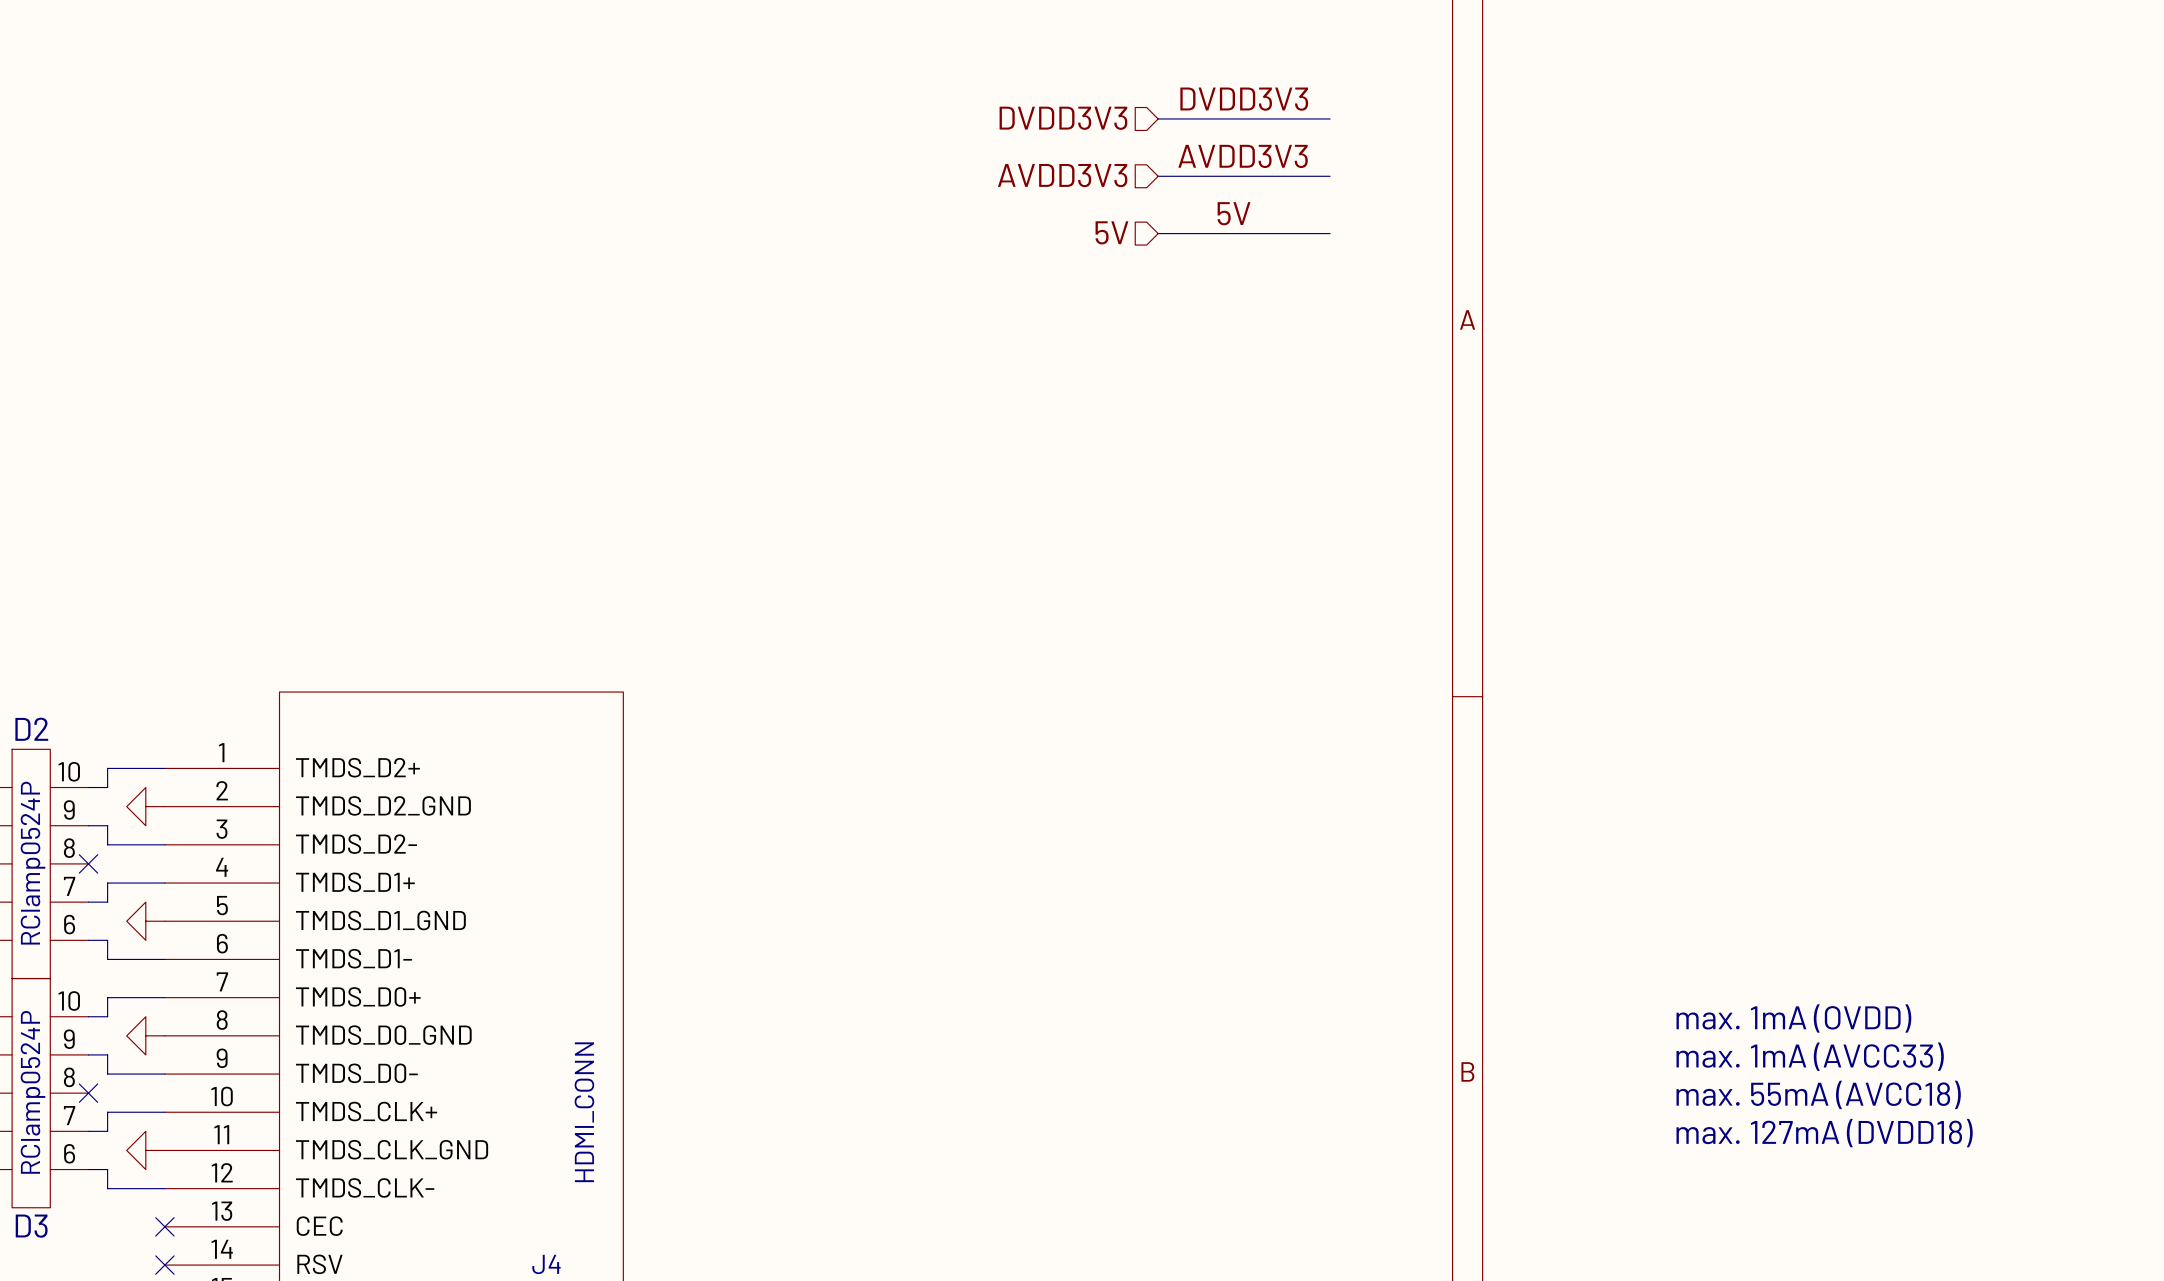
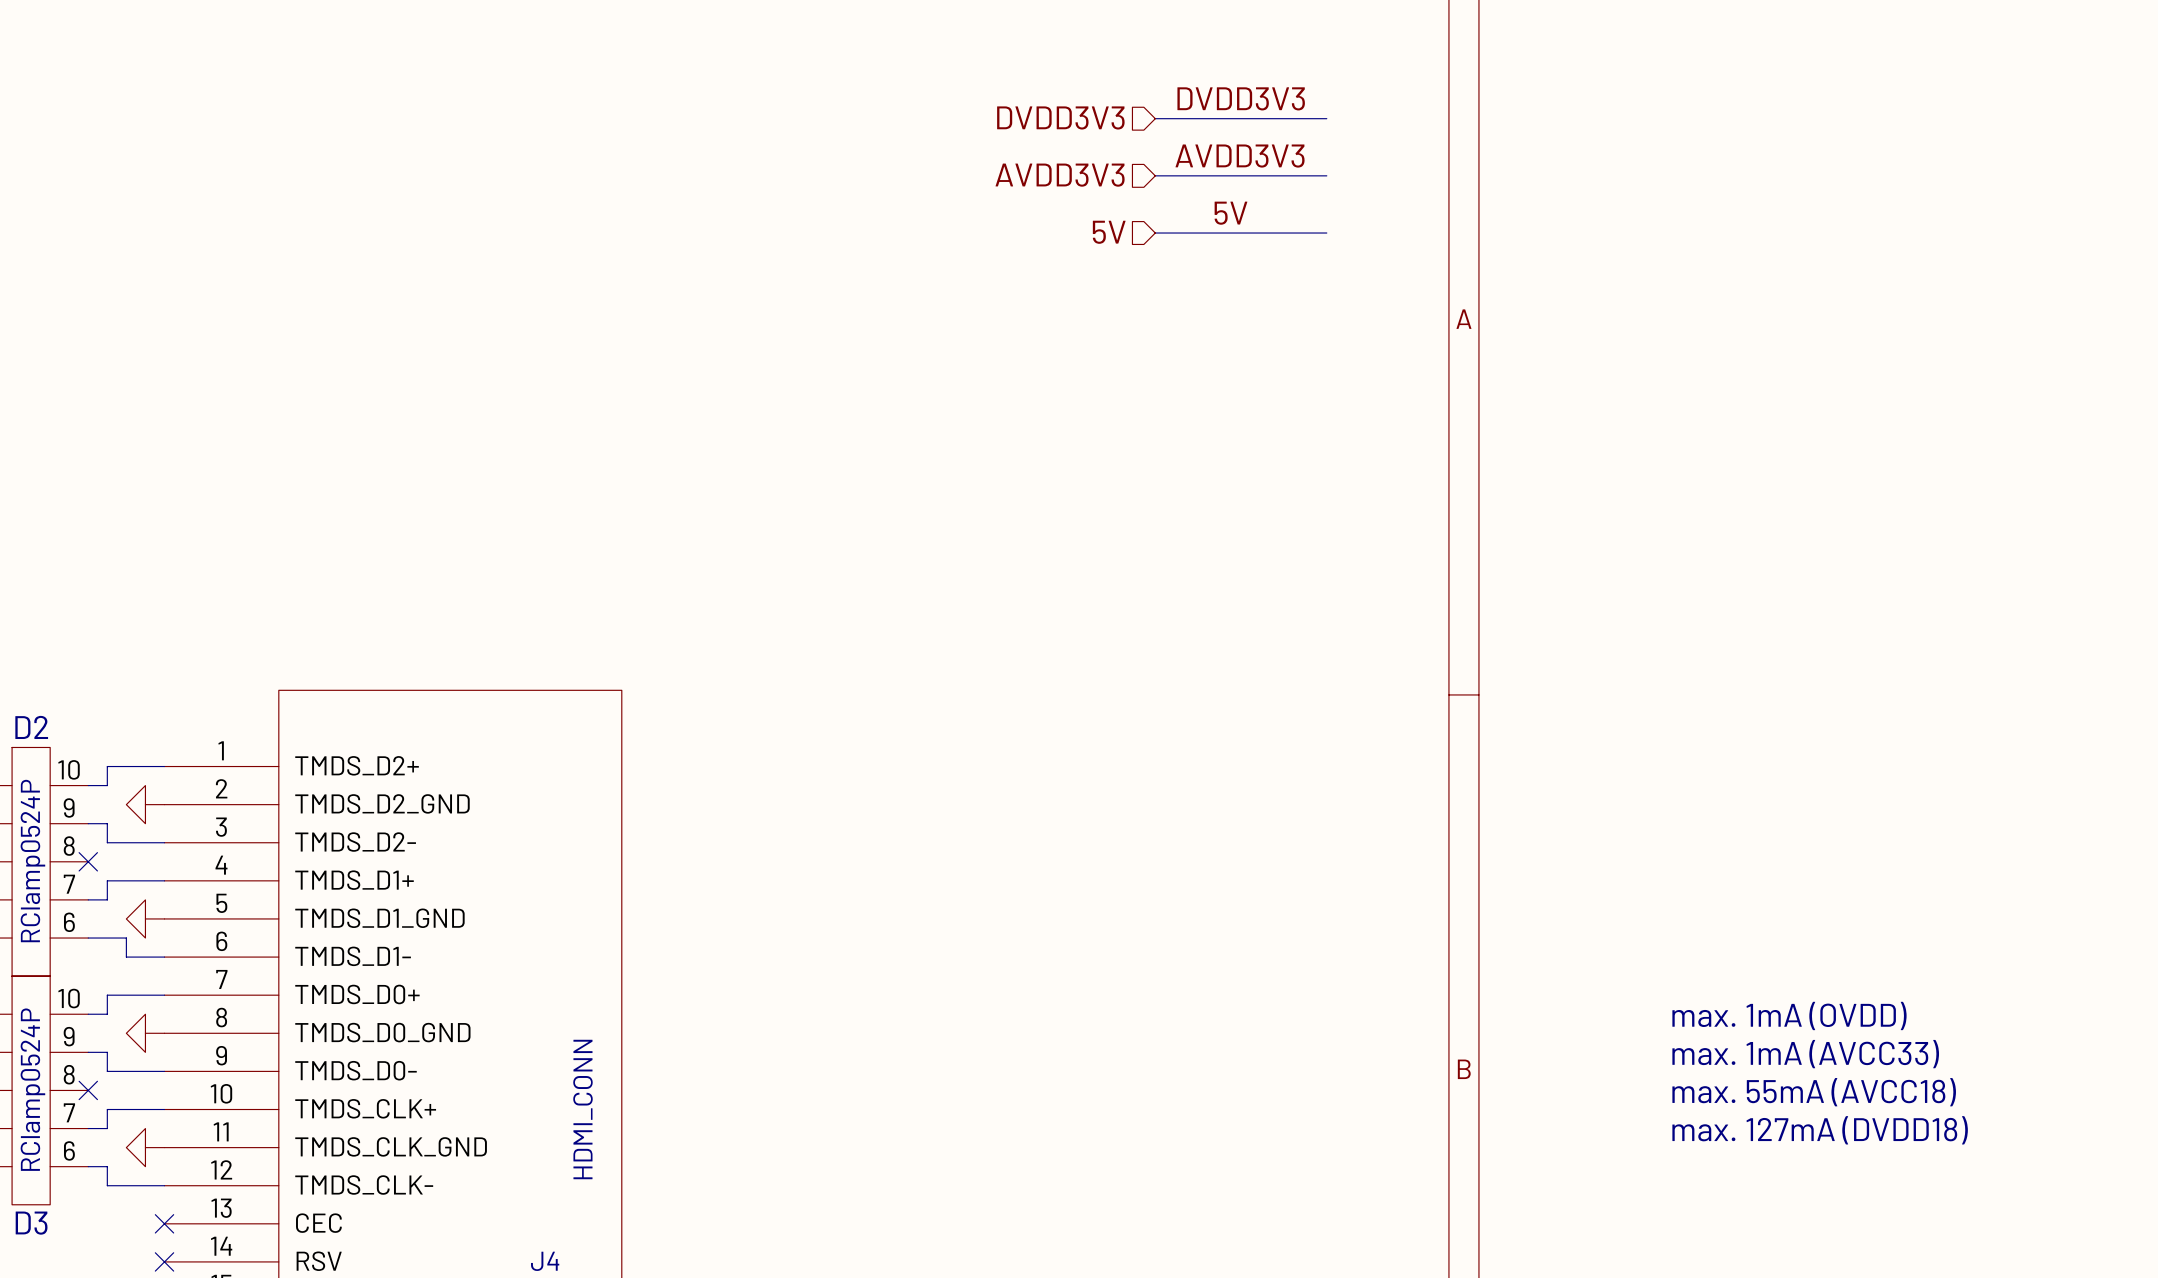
wire: (107, 940) (107, 959) (126, 959) -> (107, 938) (126, 938) (126, 957)

